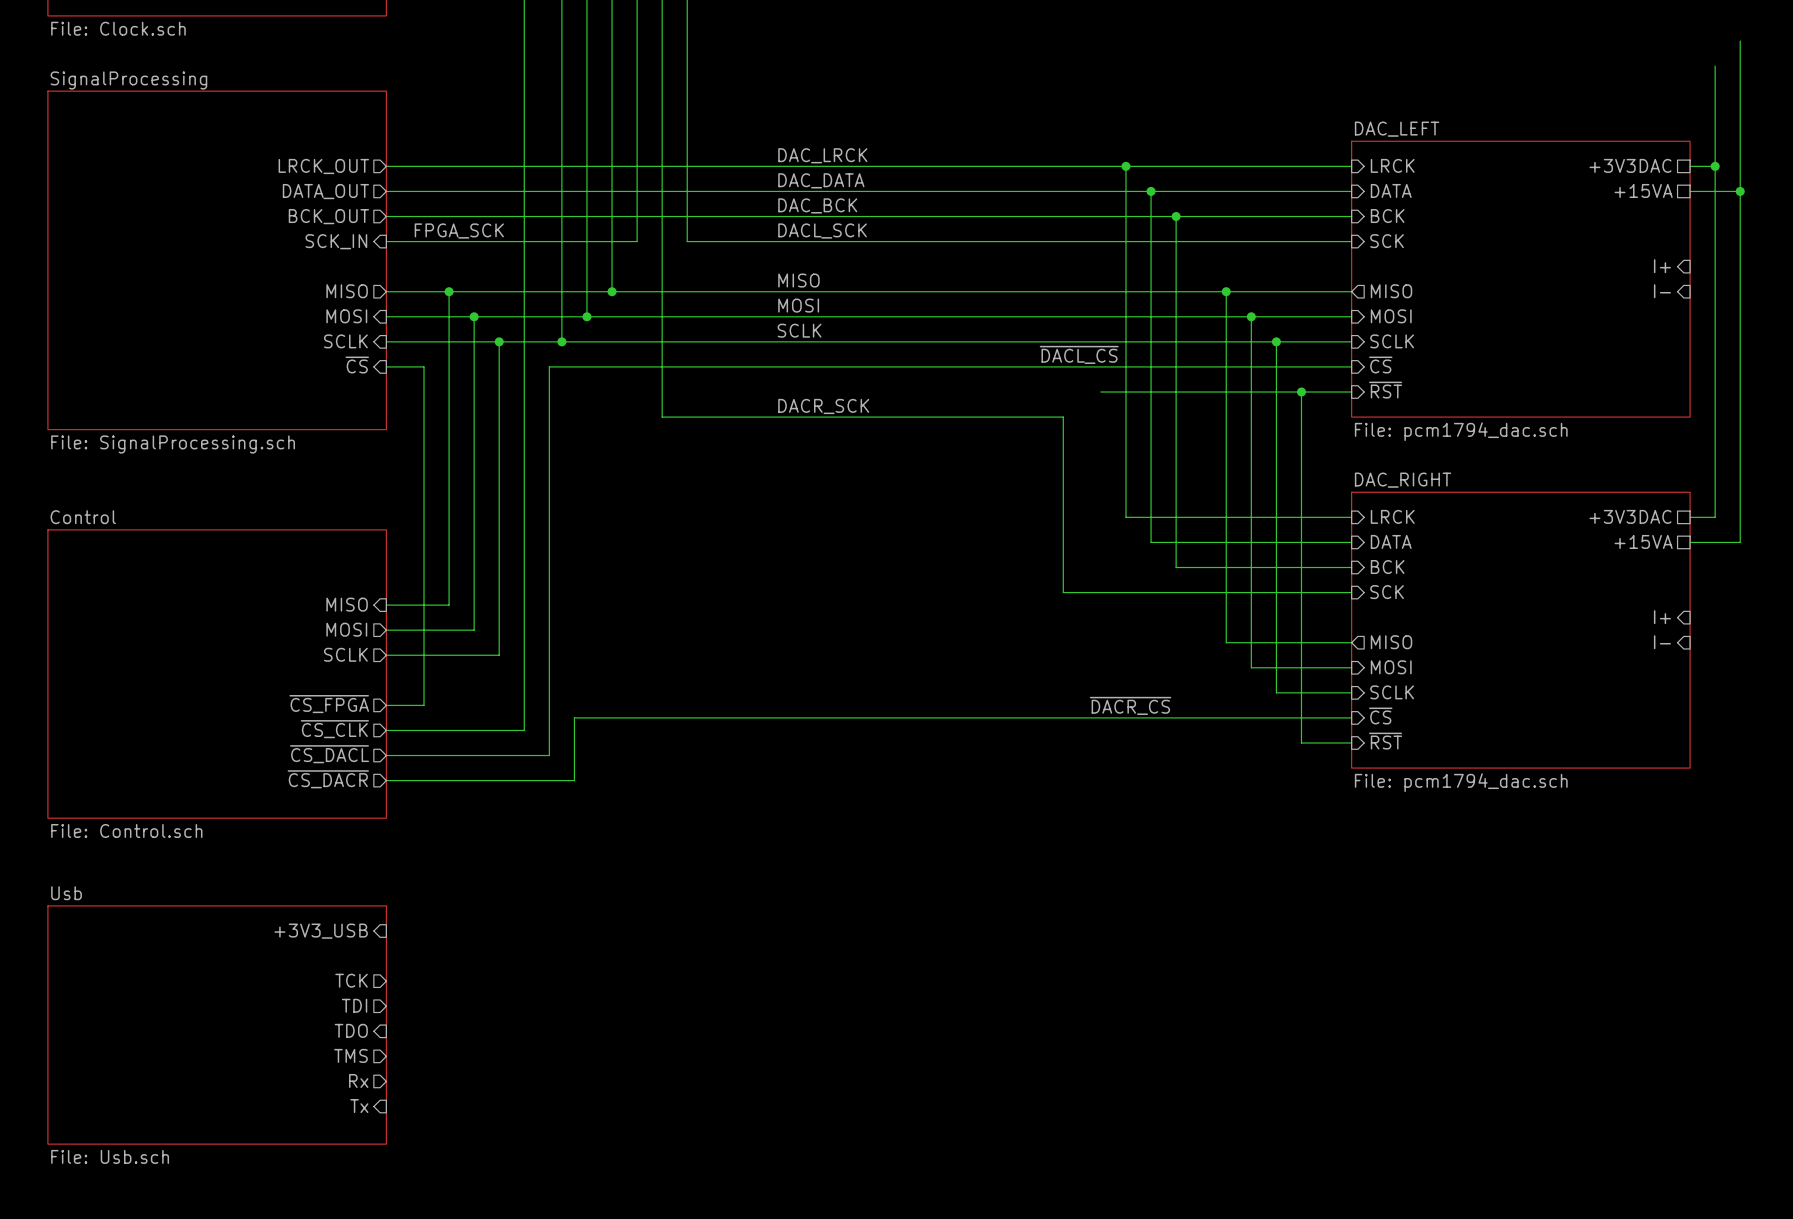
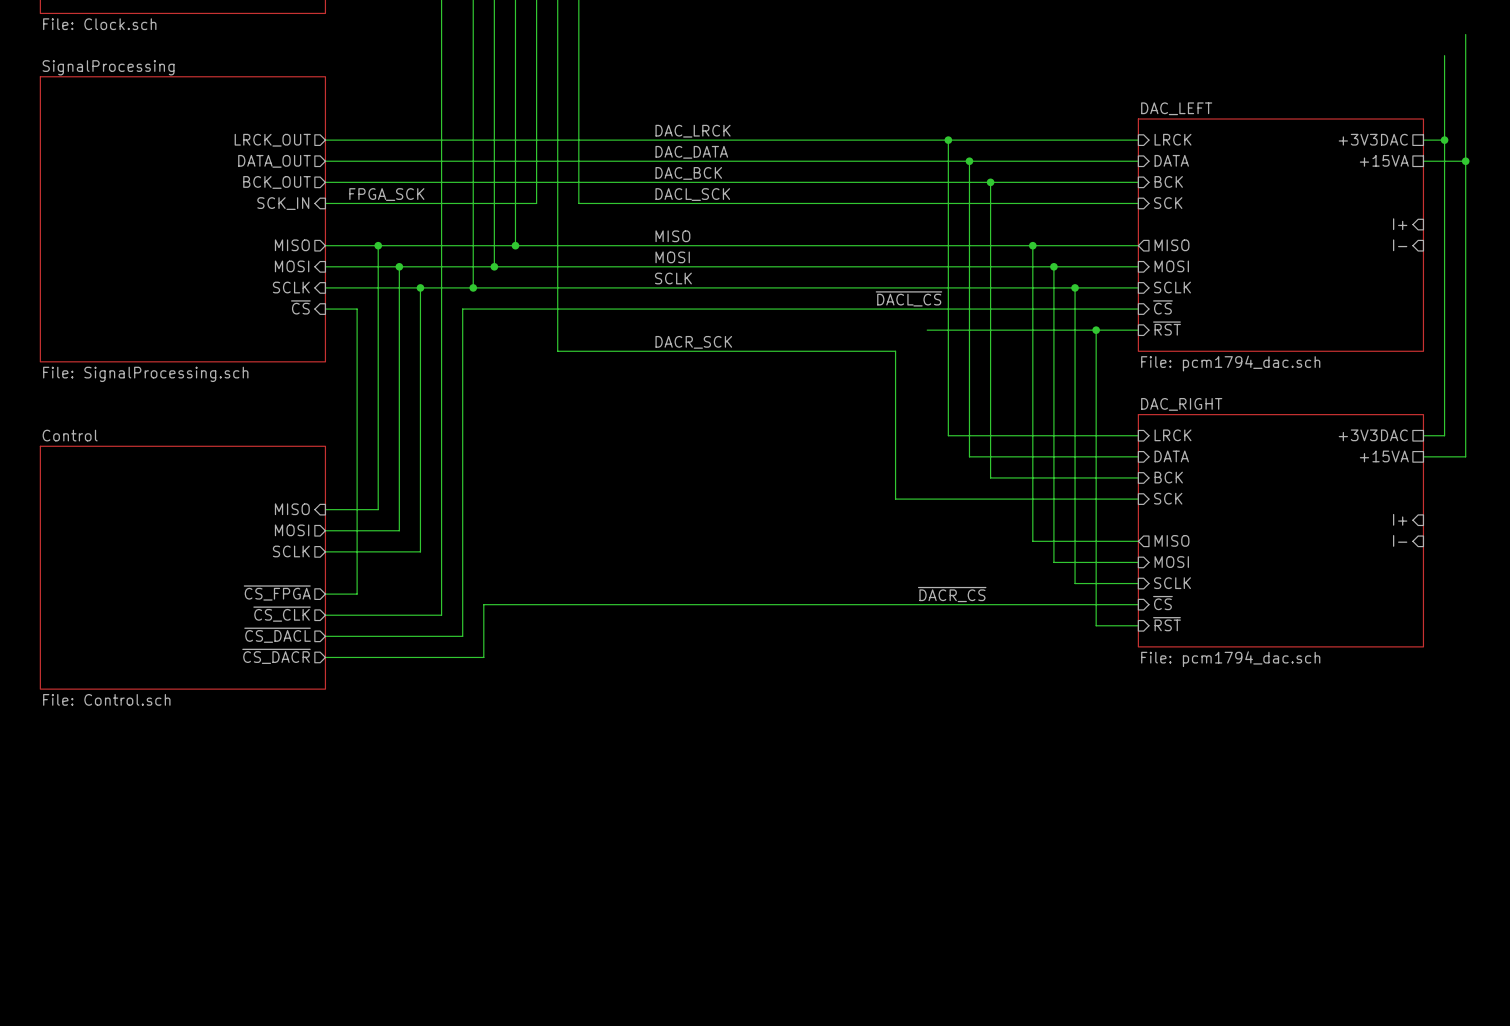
sheet pin: +3V3_USB (321, 931) -> none
sheet pin: TCK (351, 980) -> none
sheet pin: TDI (354, 1005) -> none
sheet Usb: File: Usb.sch (217, 1025) -> none
sheet pin: TDO (351, 1030) -> none
sheet pin: TMS (350, 1055) -> none
sheet pin: Rx (358, 1080) -> none
sheet pin: Tx (359, 1106) -> none

